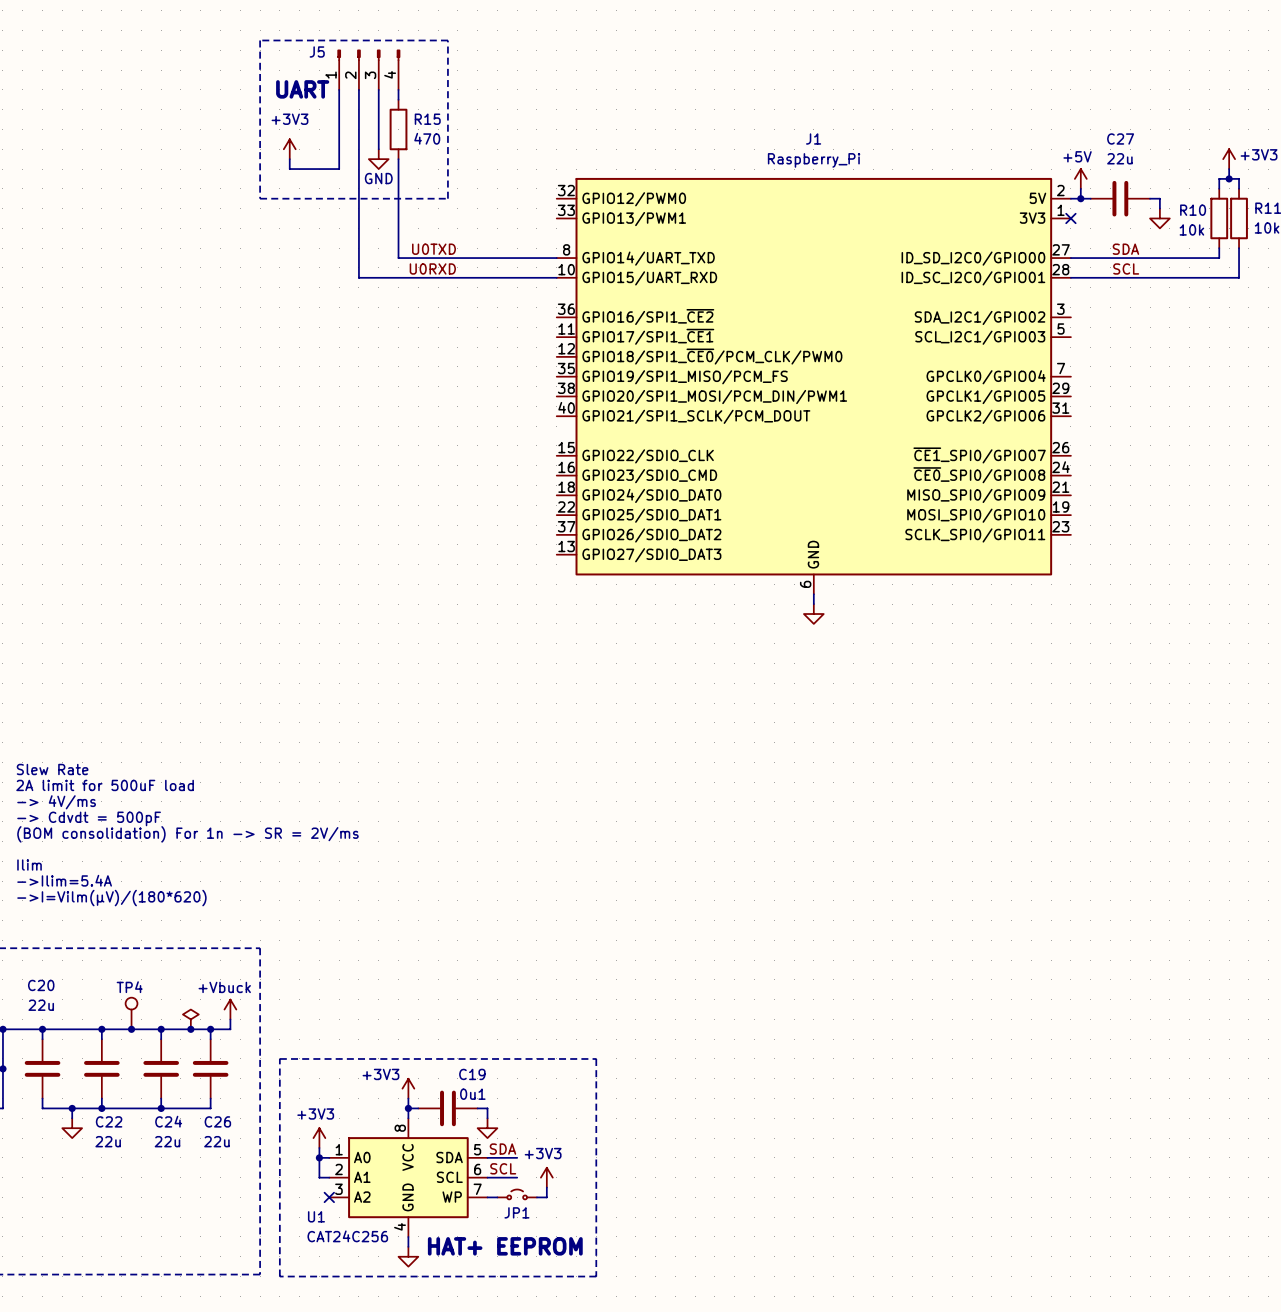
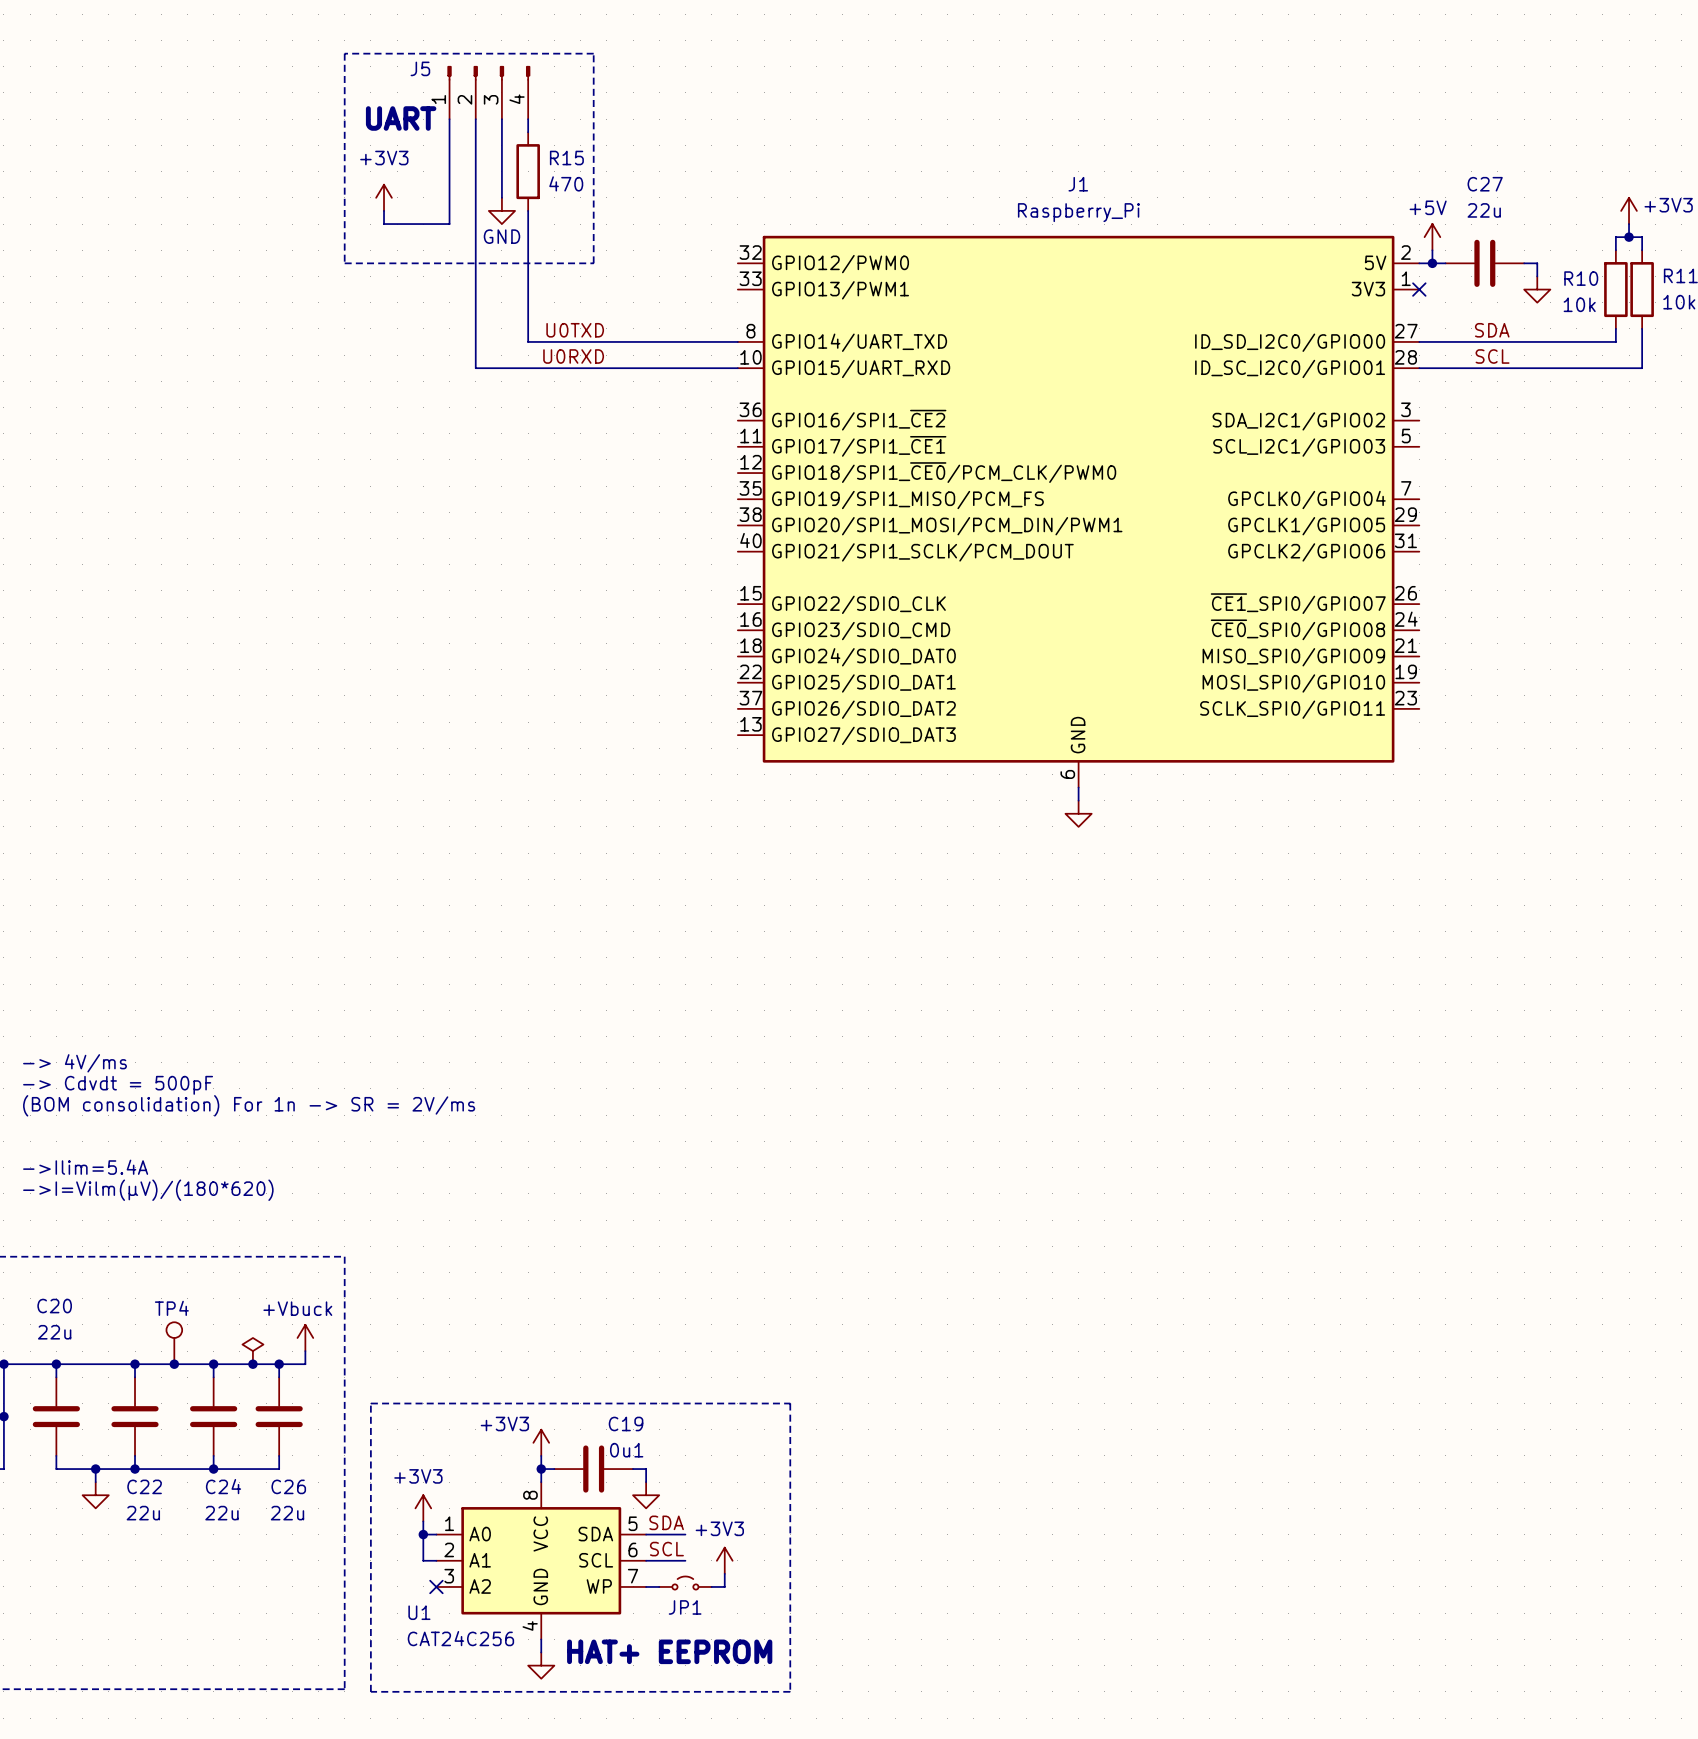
text: Slew Rate (52, 769) -> none
text: 2A limit for 500uF load (105, 785) -> none
text: Ilim (29, 865) -> none

